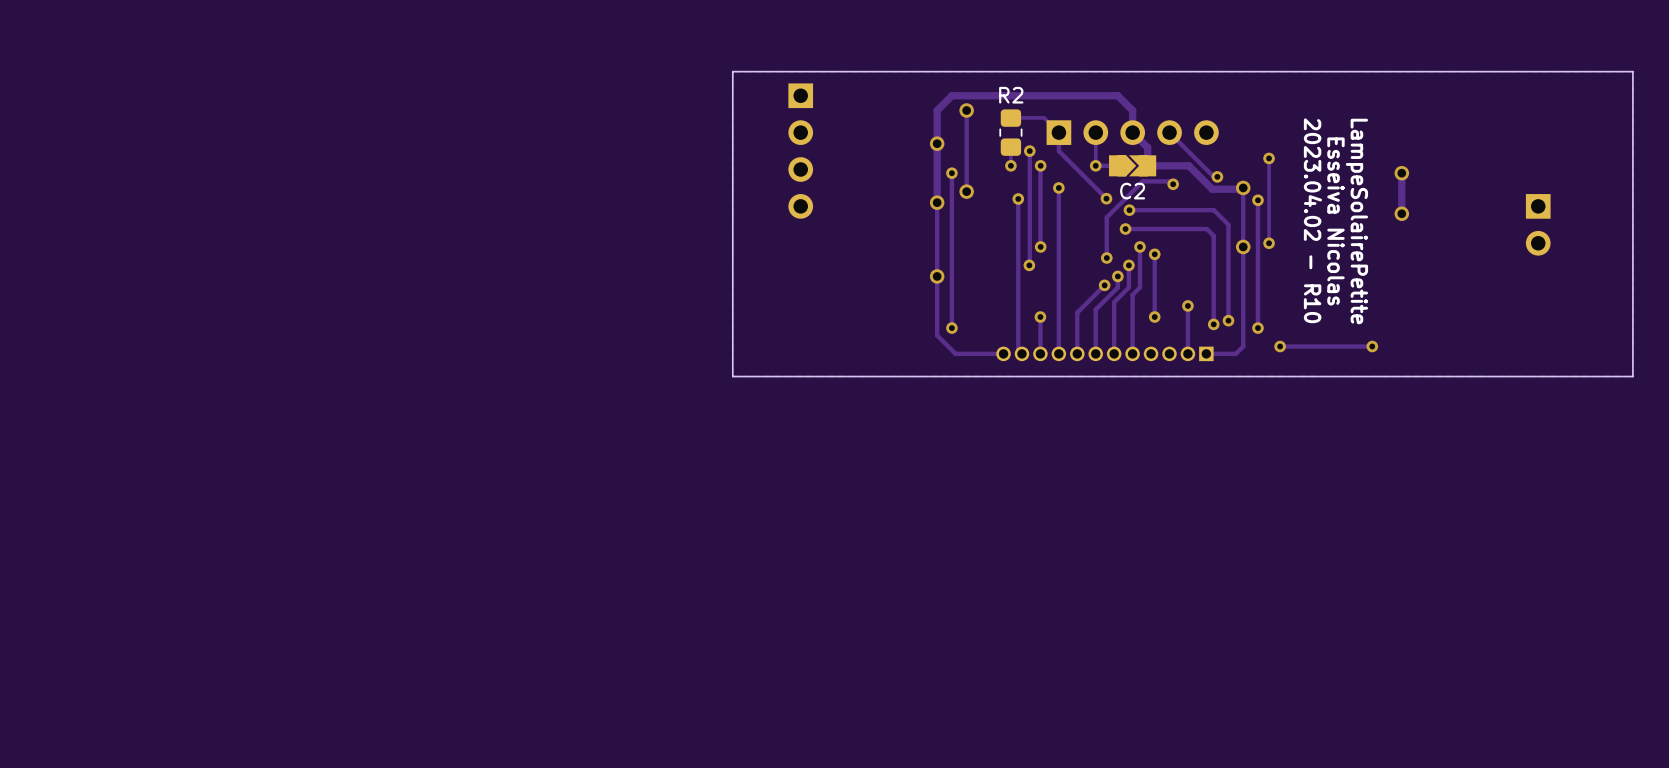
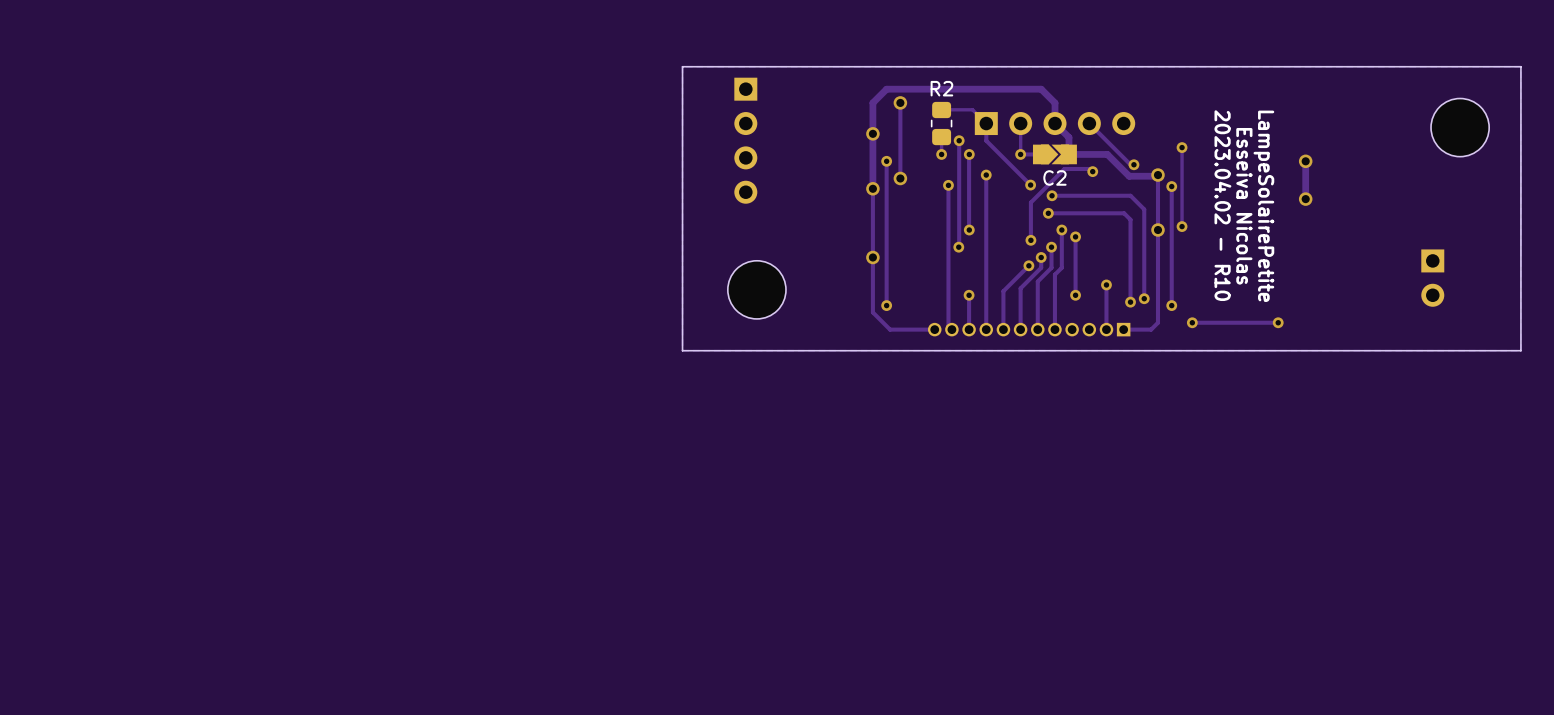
part: none -> (1460, 127)
part position: (1538, 224) -> (1432, 278)
part: none -> (756, 289)

